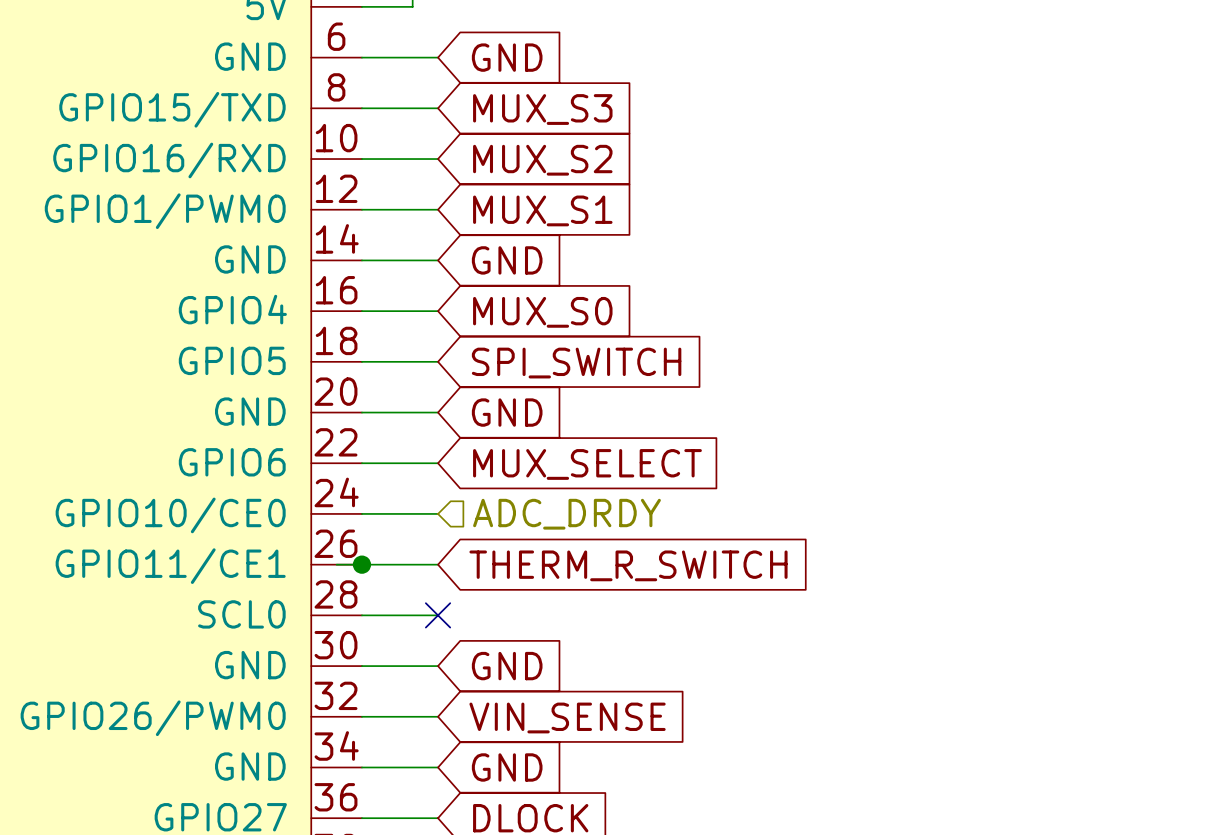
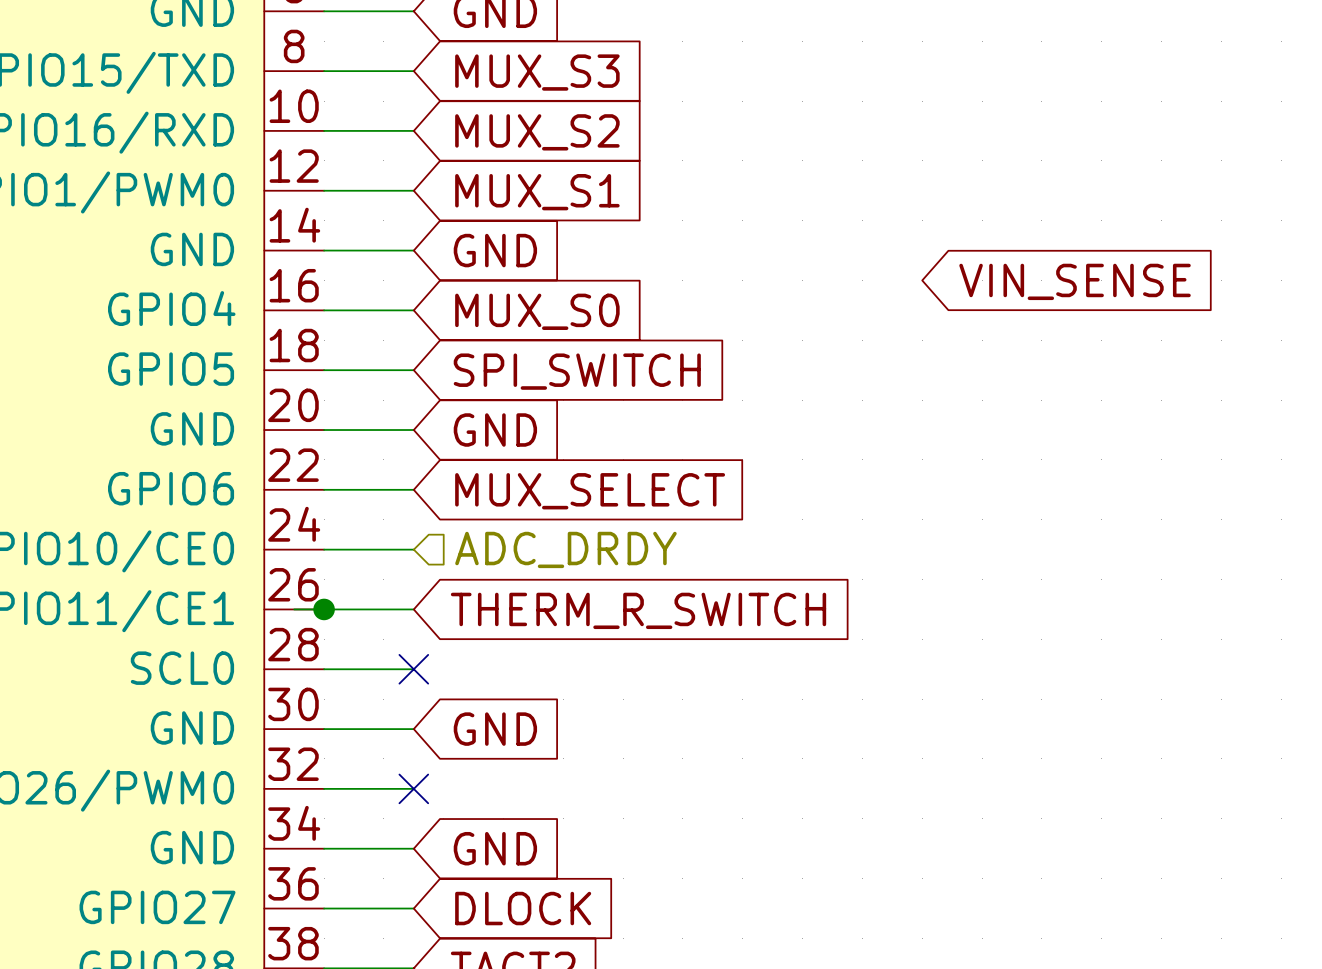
global label: none -> VIN_SENSE (1075, 281)
no-connect mark: none -> (413, 788)
global label: VIN_SENSE (567, 717) -> none

